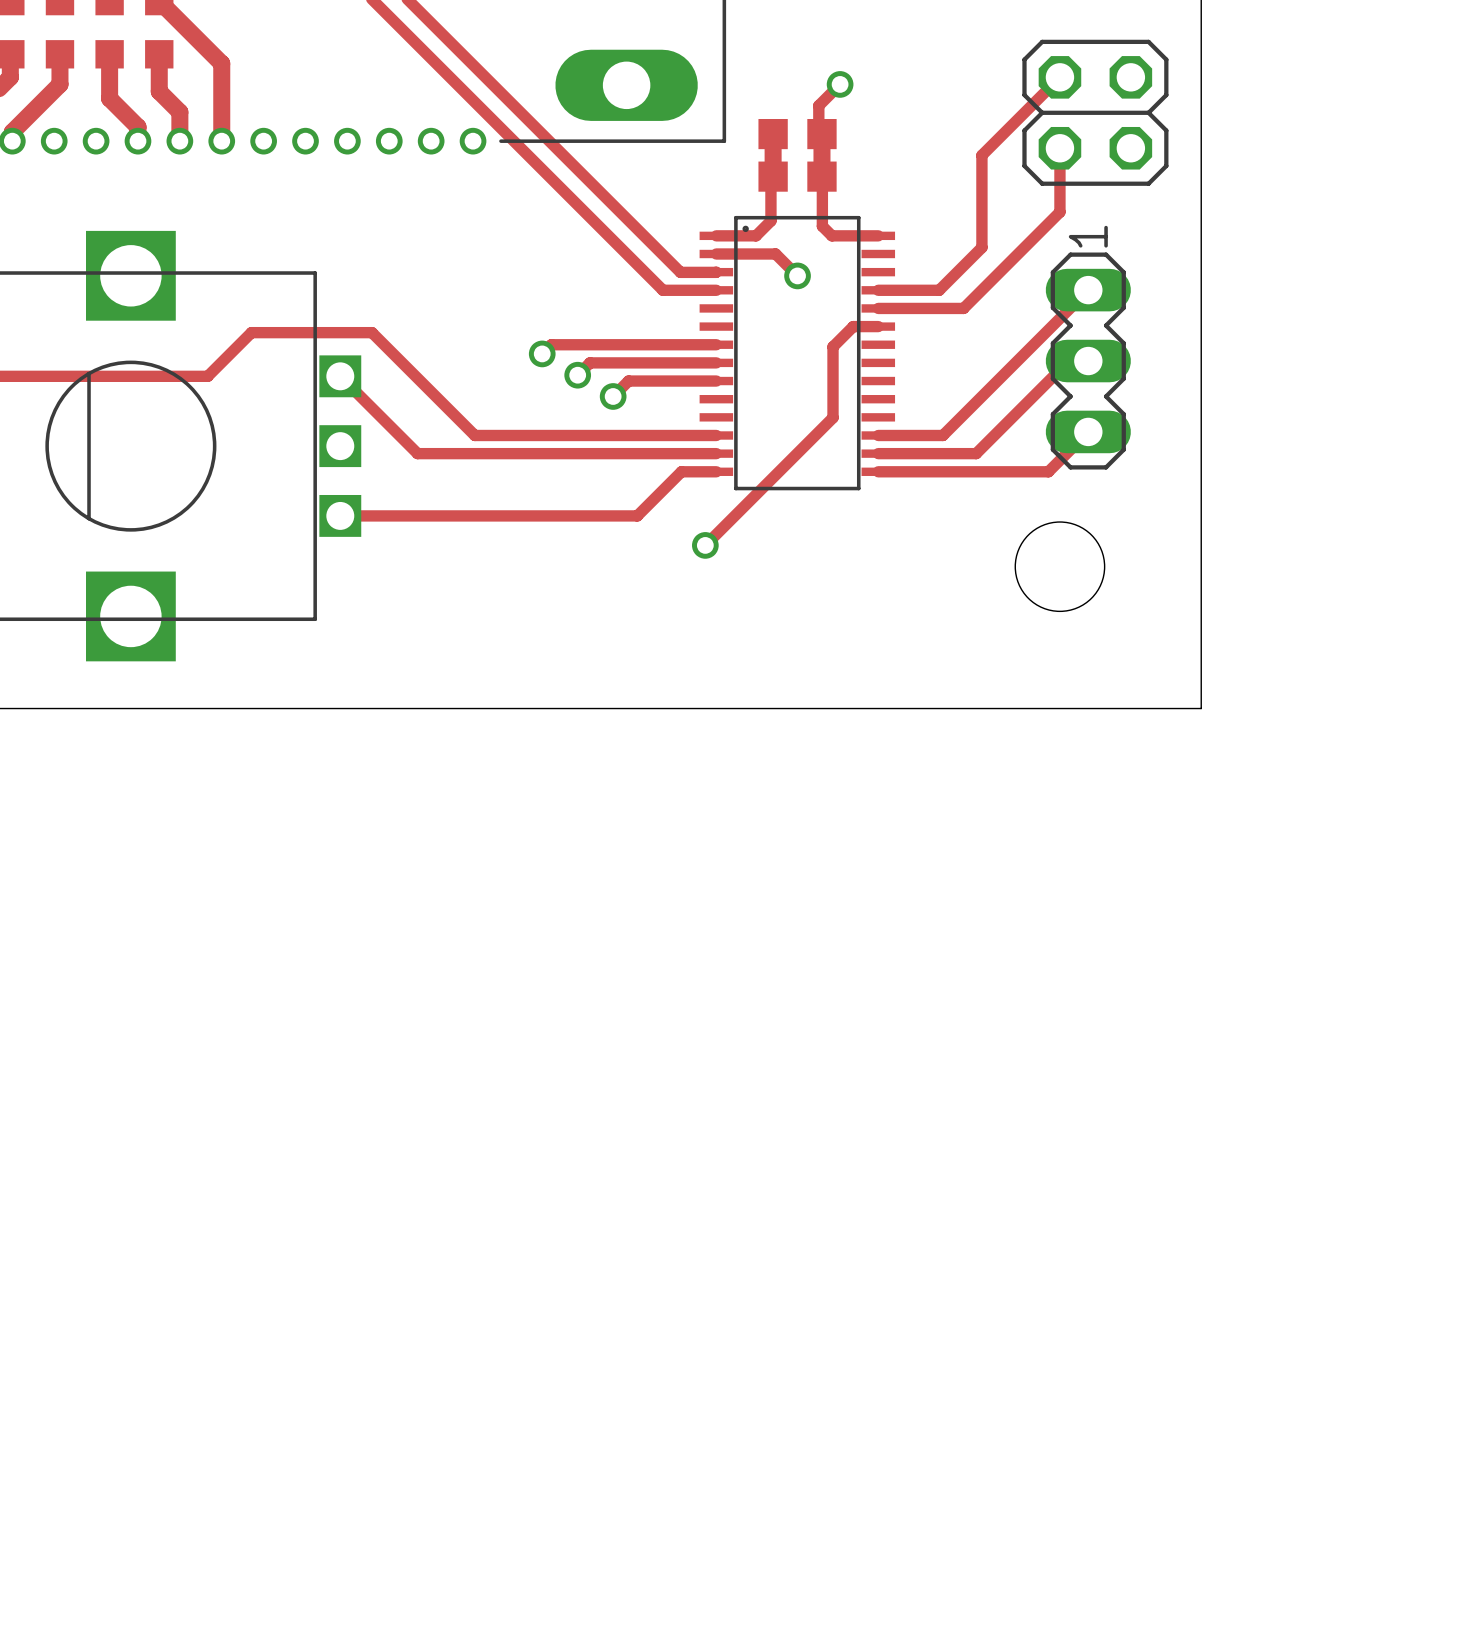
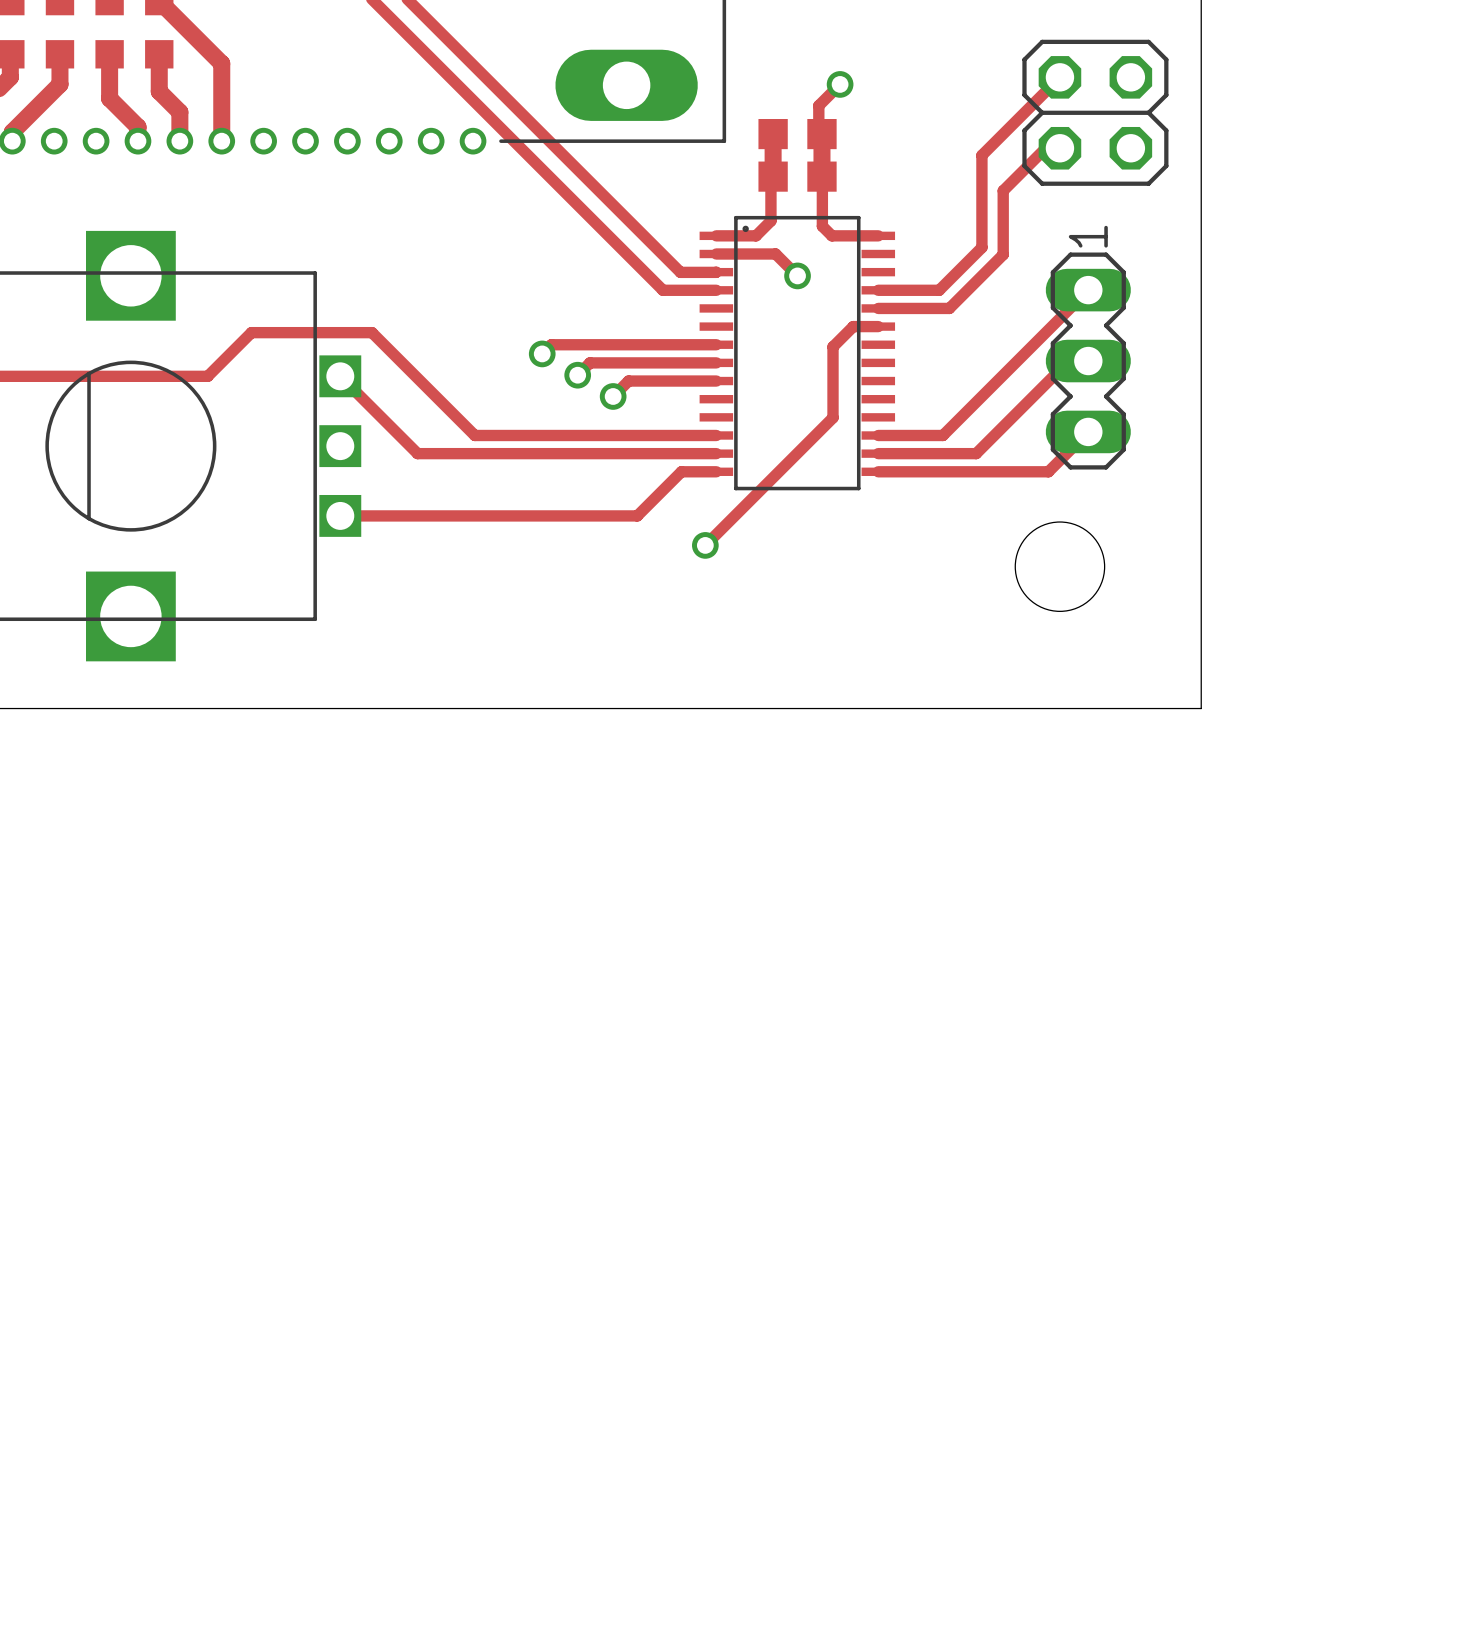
track: (1059, 148) (1059, 212) (963, 308) (949, 308) -> (1059, 148) (1045, 148) (1003, 190) (1003, 254) (949, 308)

